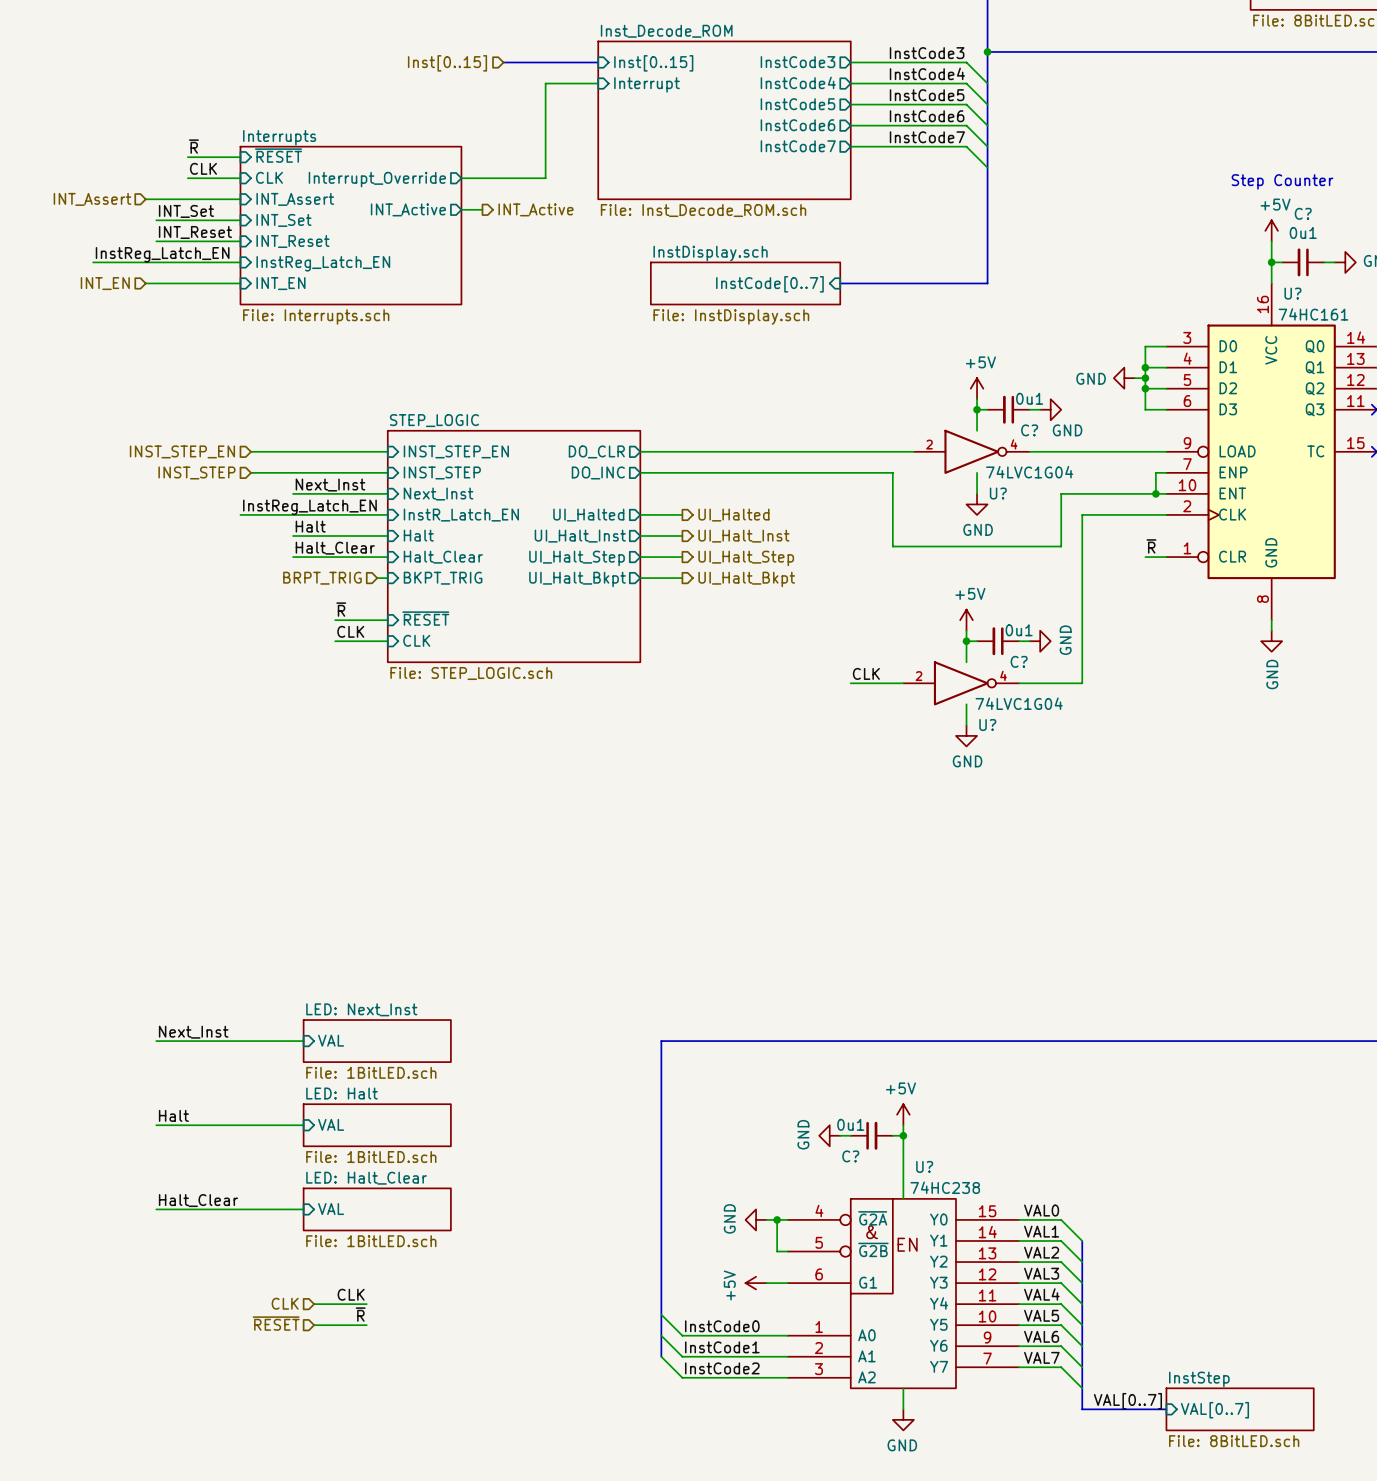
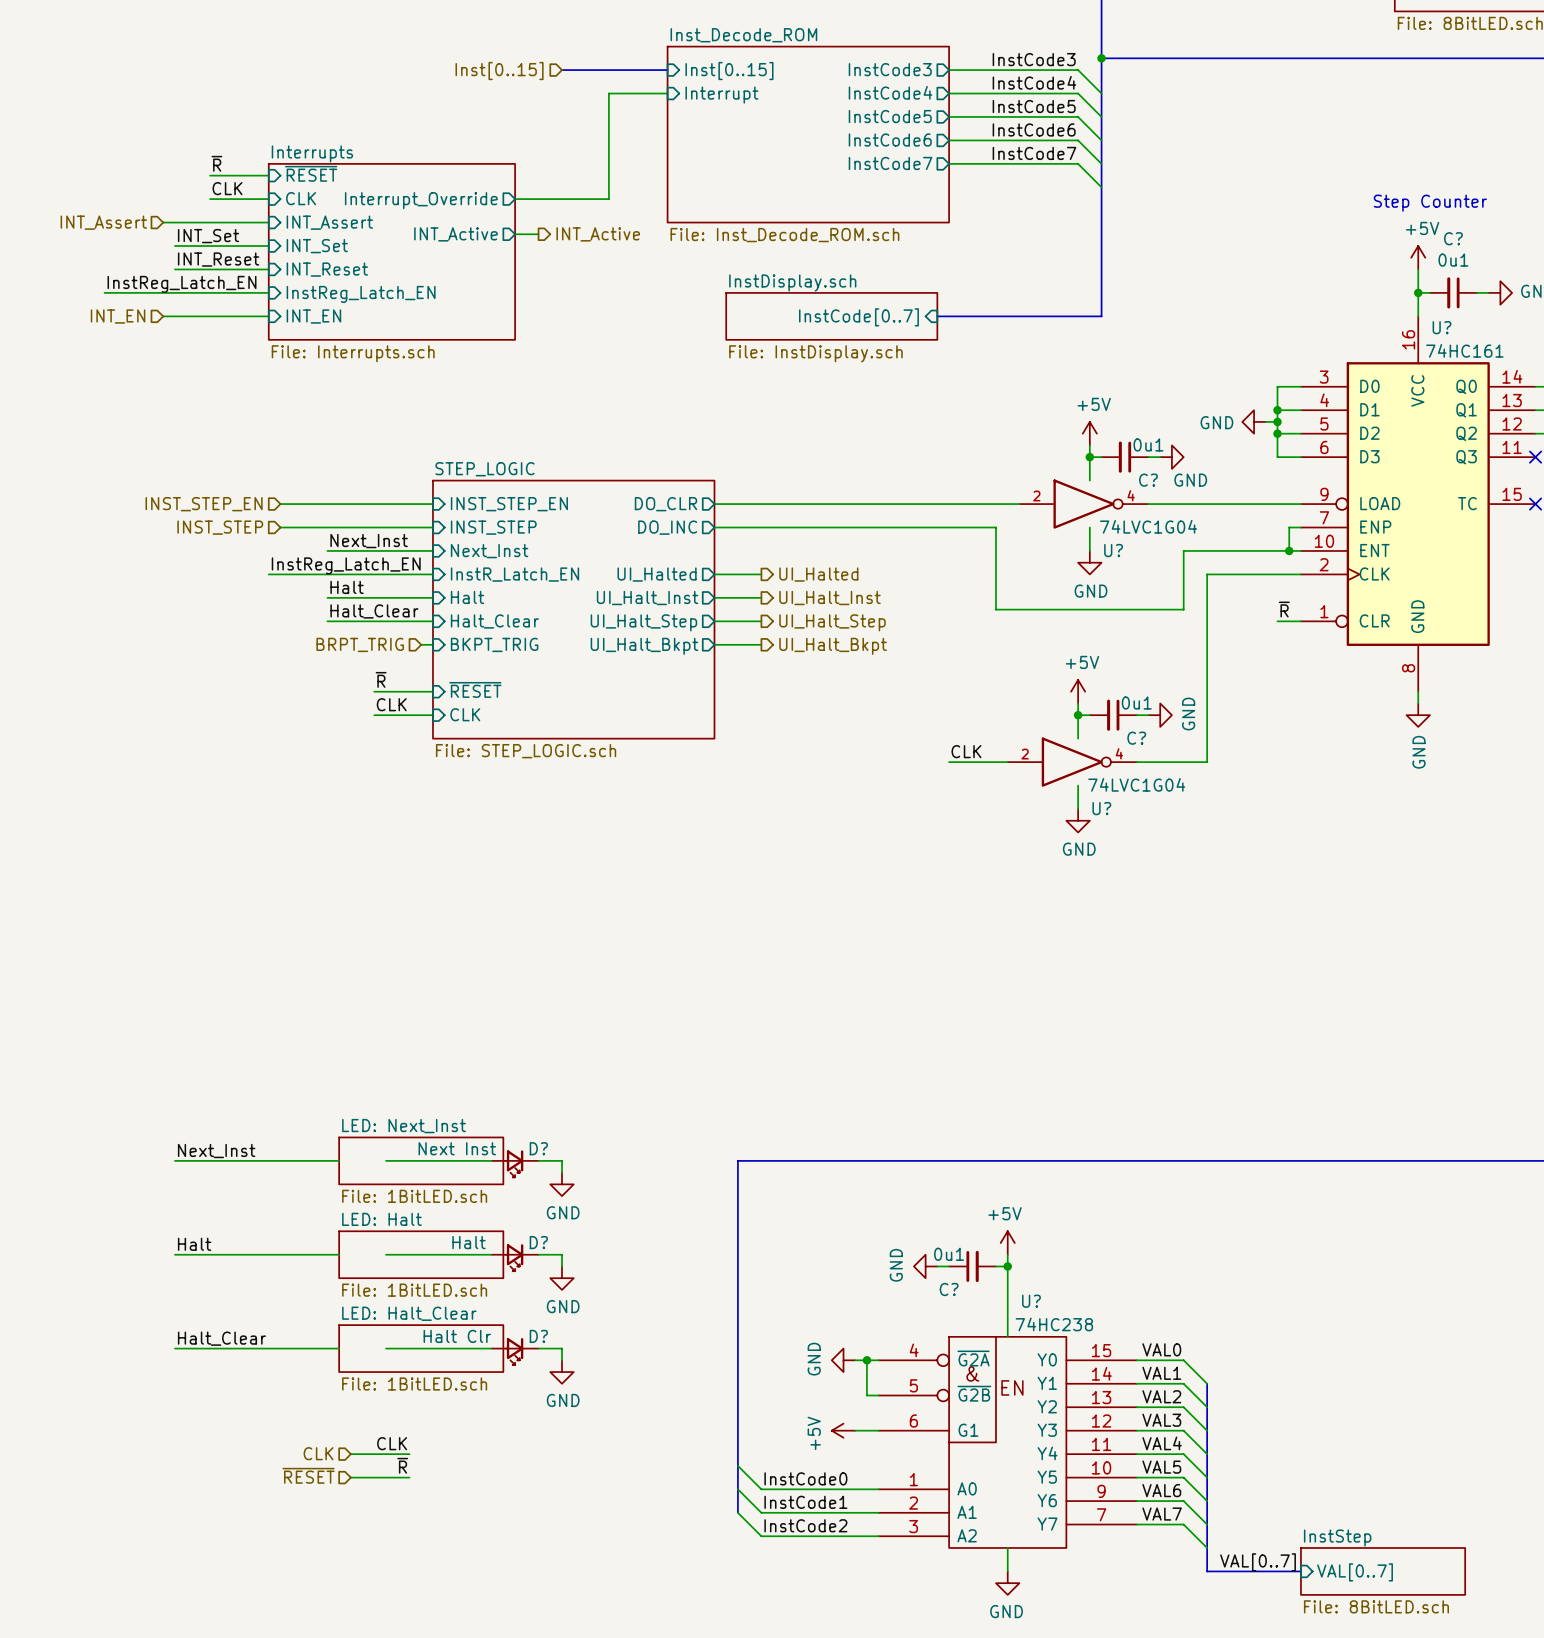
sheet pin: VAL (331, 1040) -> none
wire: none -> (386, 1160) (491, 1160)
wire: none -> (538, 1160) (562, 1160) (562, 1172)
D?: none -> Next Inst (515, 1163)
power symbol: none -> GND (562, 1184)
sheet pin: VAL (331, 1124) -> none
wire: none -> (386, 1254) (491, 1254)
wire: none -> (538, 1254) (562, 1254) (562, 1266)
D?: none -> Halt (515, 1257)
power symbol: none -> GND (562, 1278)
sheet pin: VAL (331, 1209) -> none
wire: none -> (386, 1348) (491, 1348)
wire: none -> (538, 1348) (562, 1348) (562, 1360)
D?: none -> Halt Clr (515, 1351)
power symbol: none -> GND (562, 1372)

